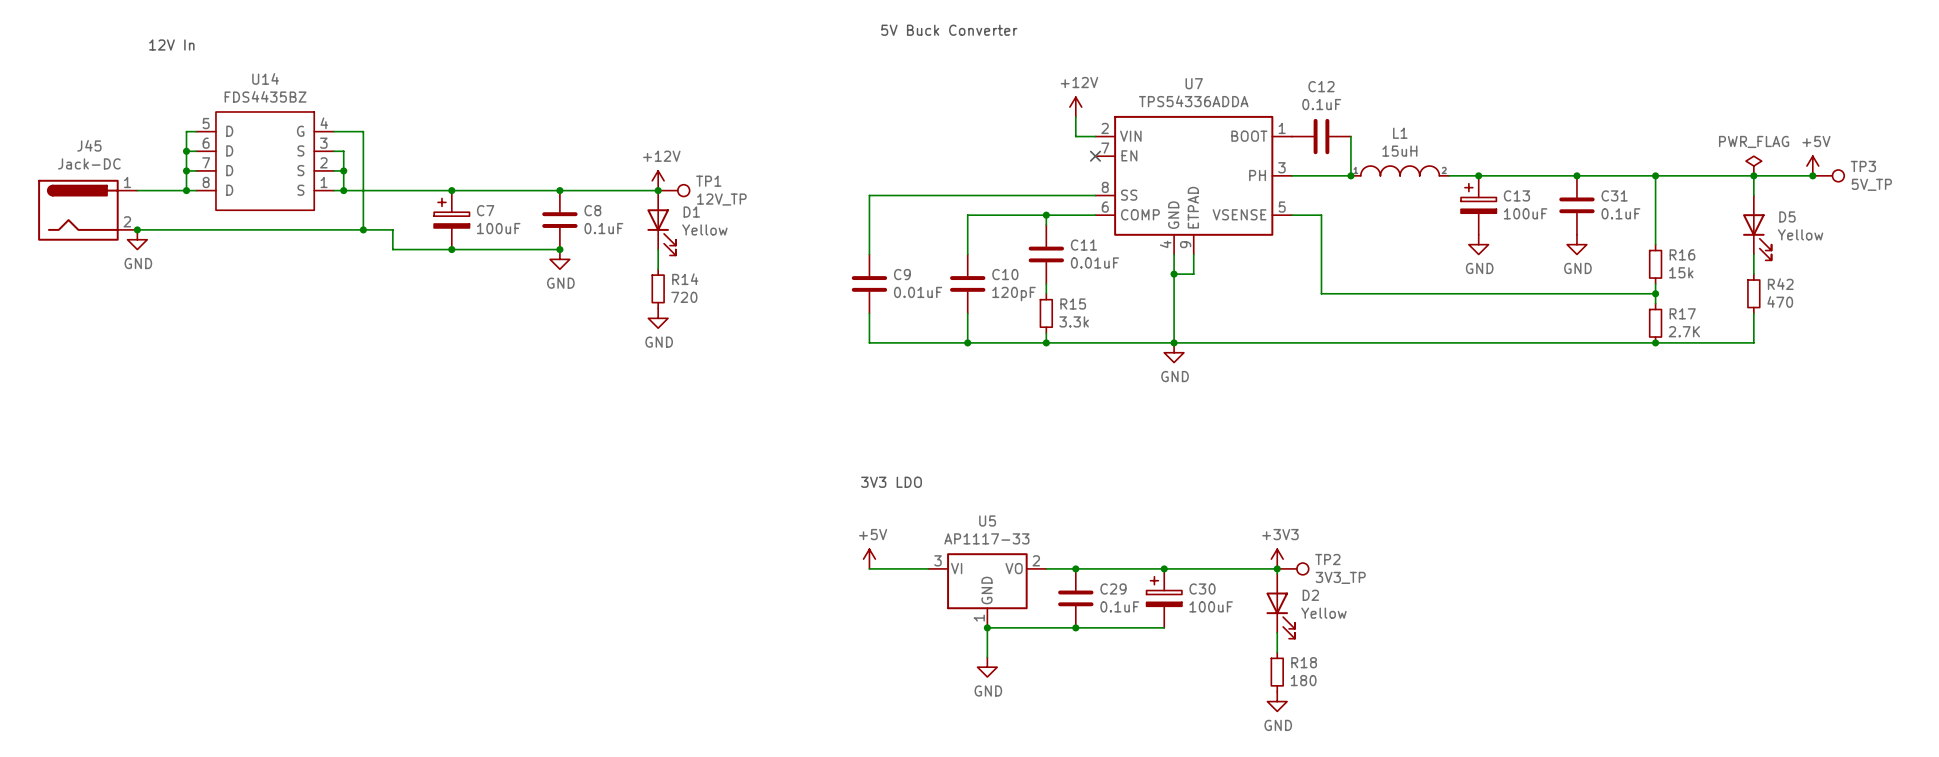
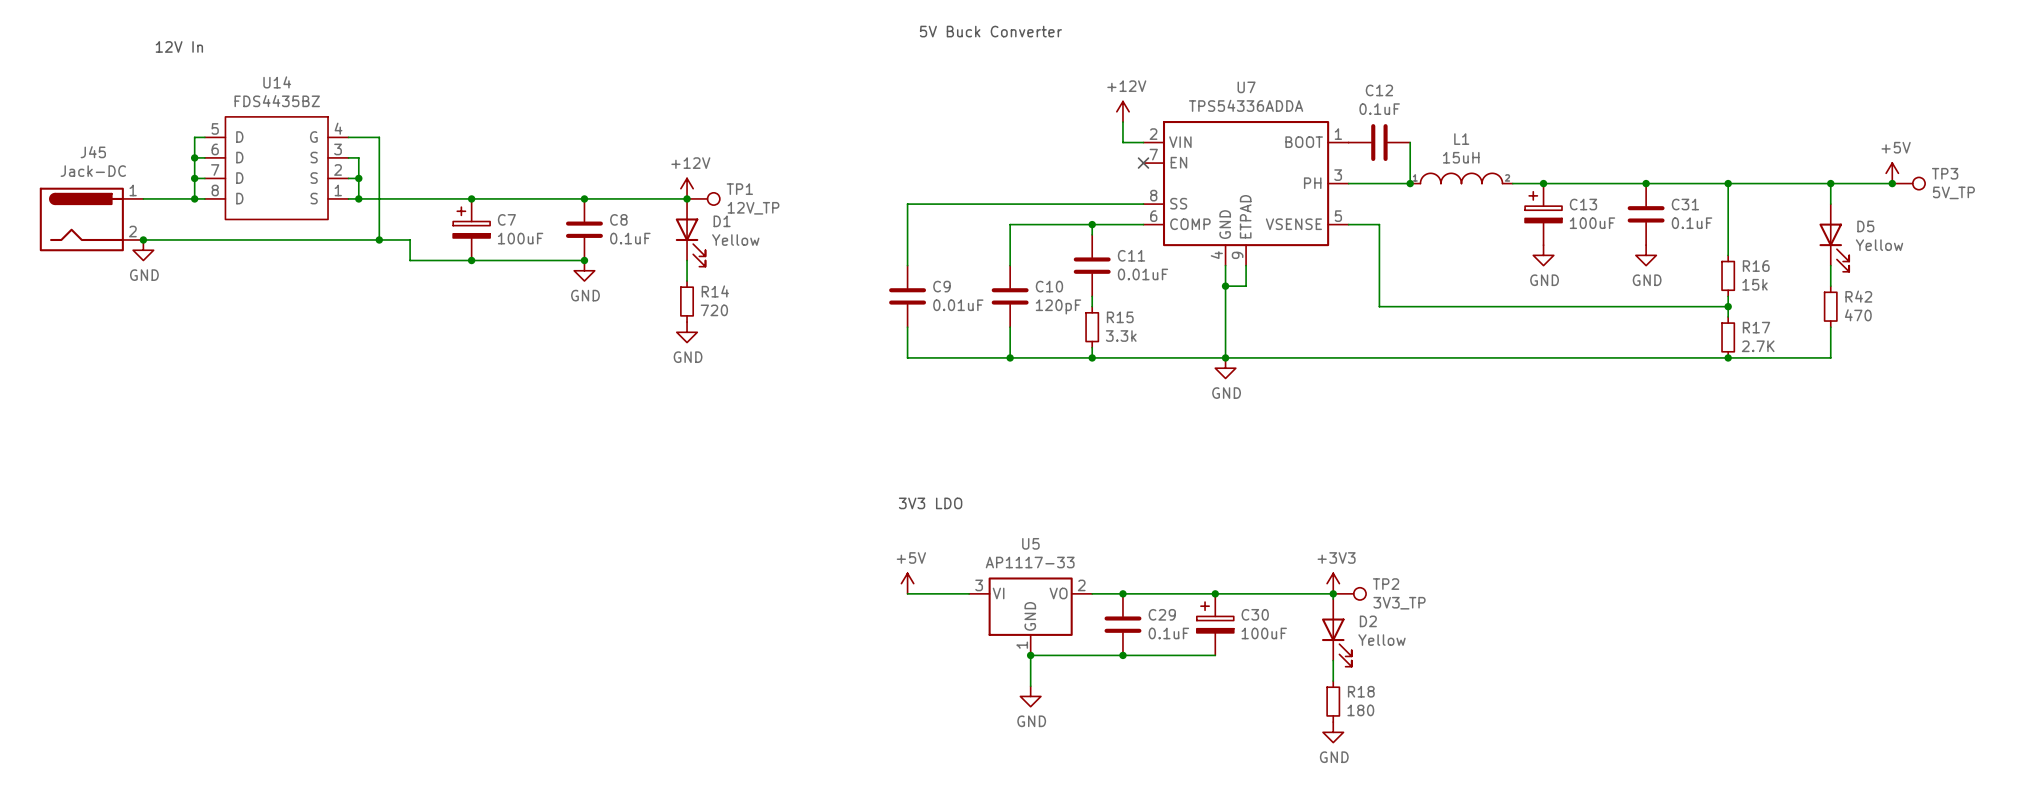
power symbol: PWR_FLAG (1753, 166) -> none

